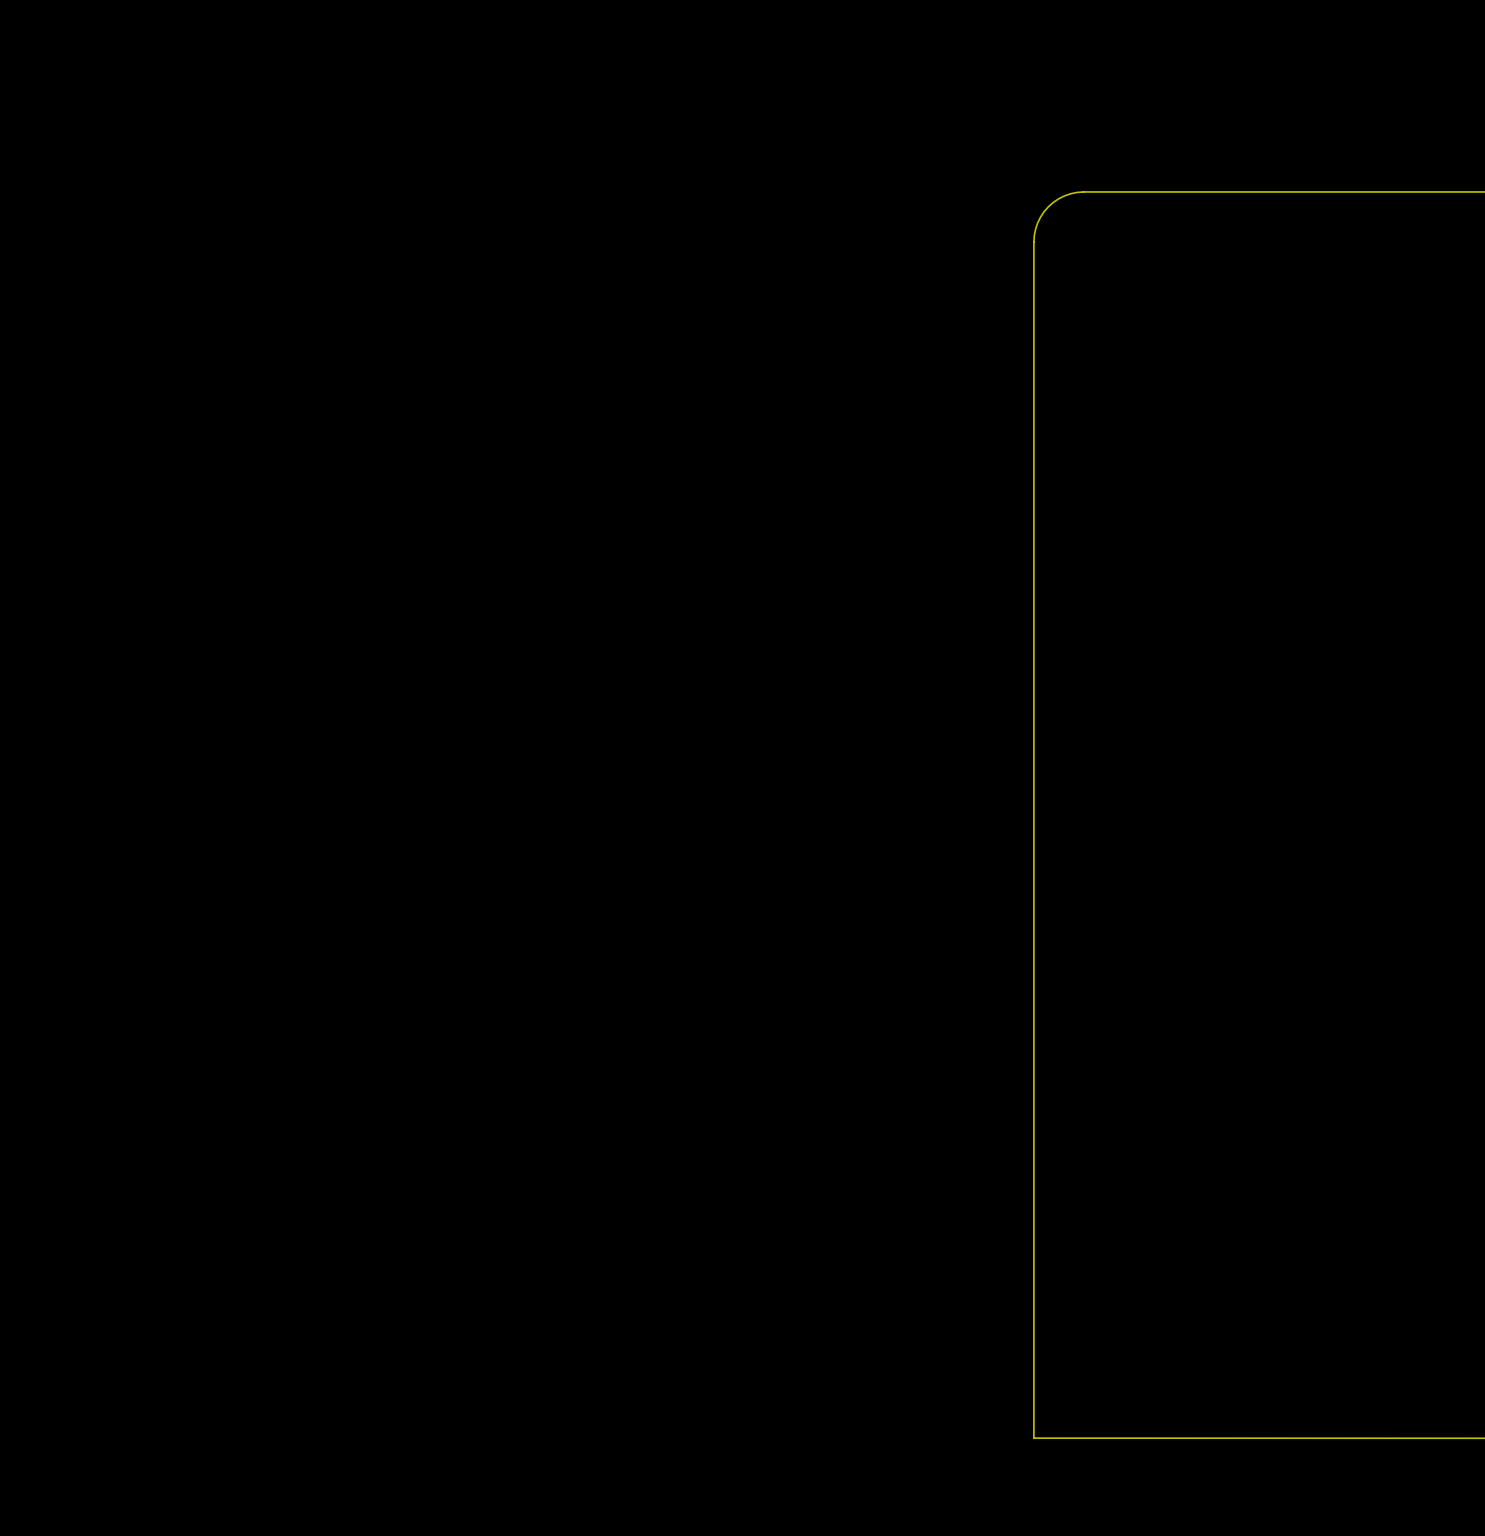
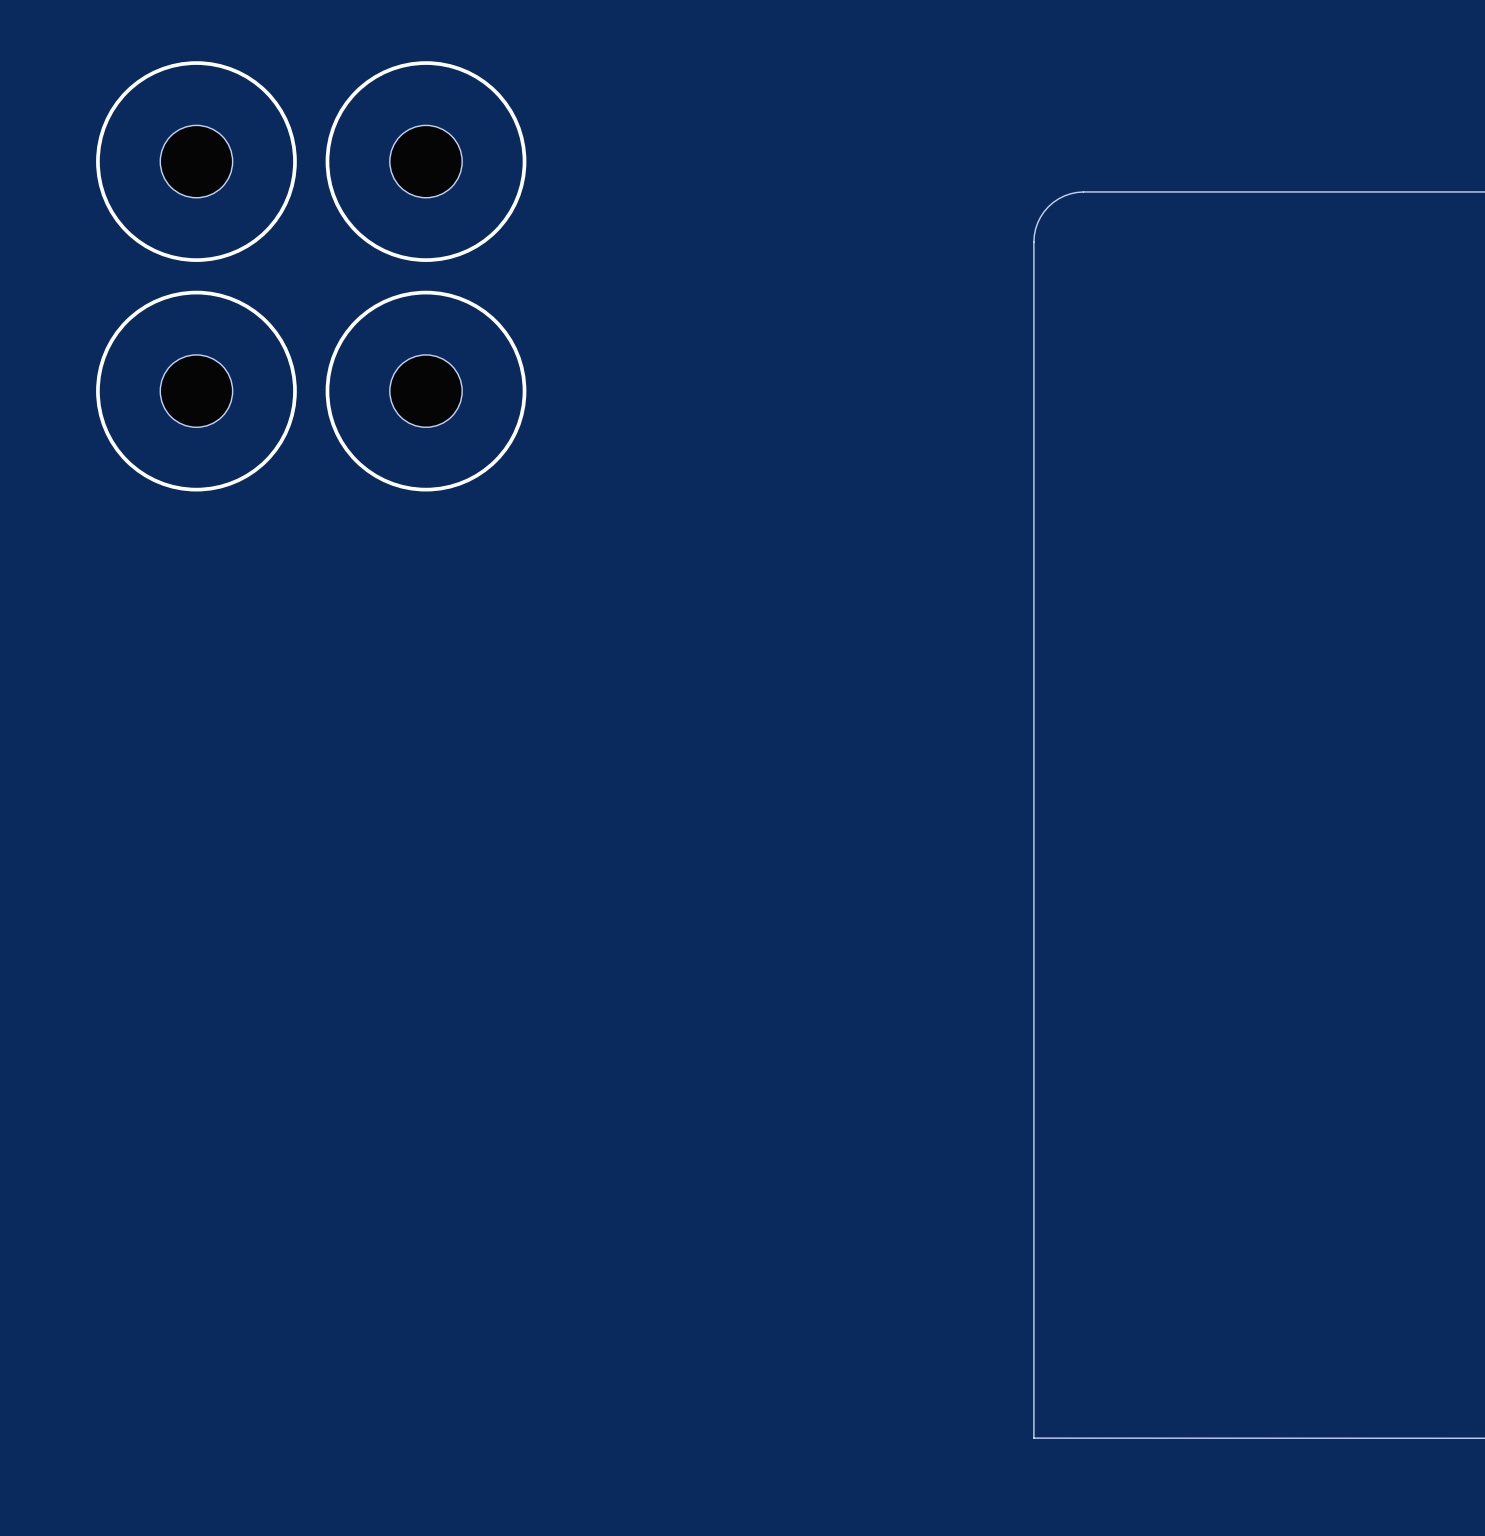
part: none -> (196, 161)
part: none -> (426, 161)
part: none -> (196, 391)
part: none -> (426, 391)

